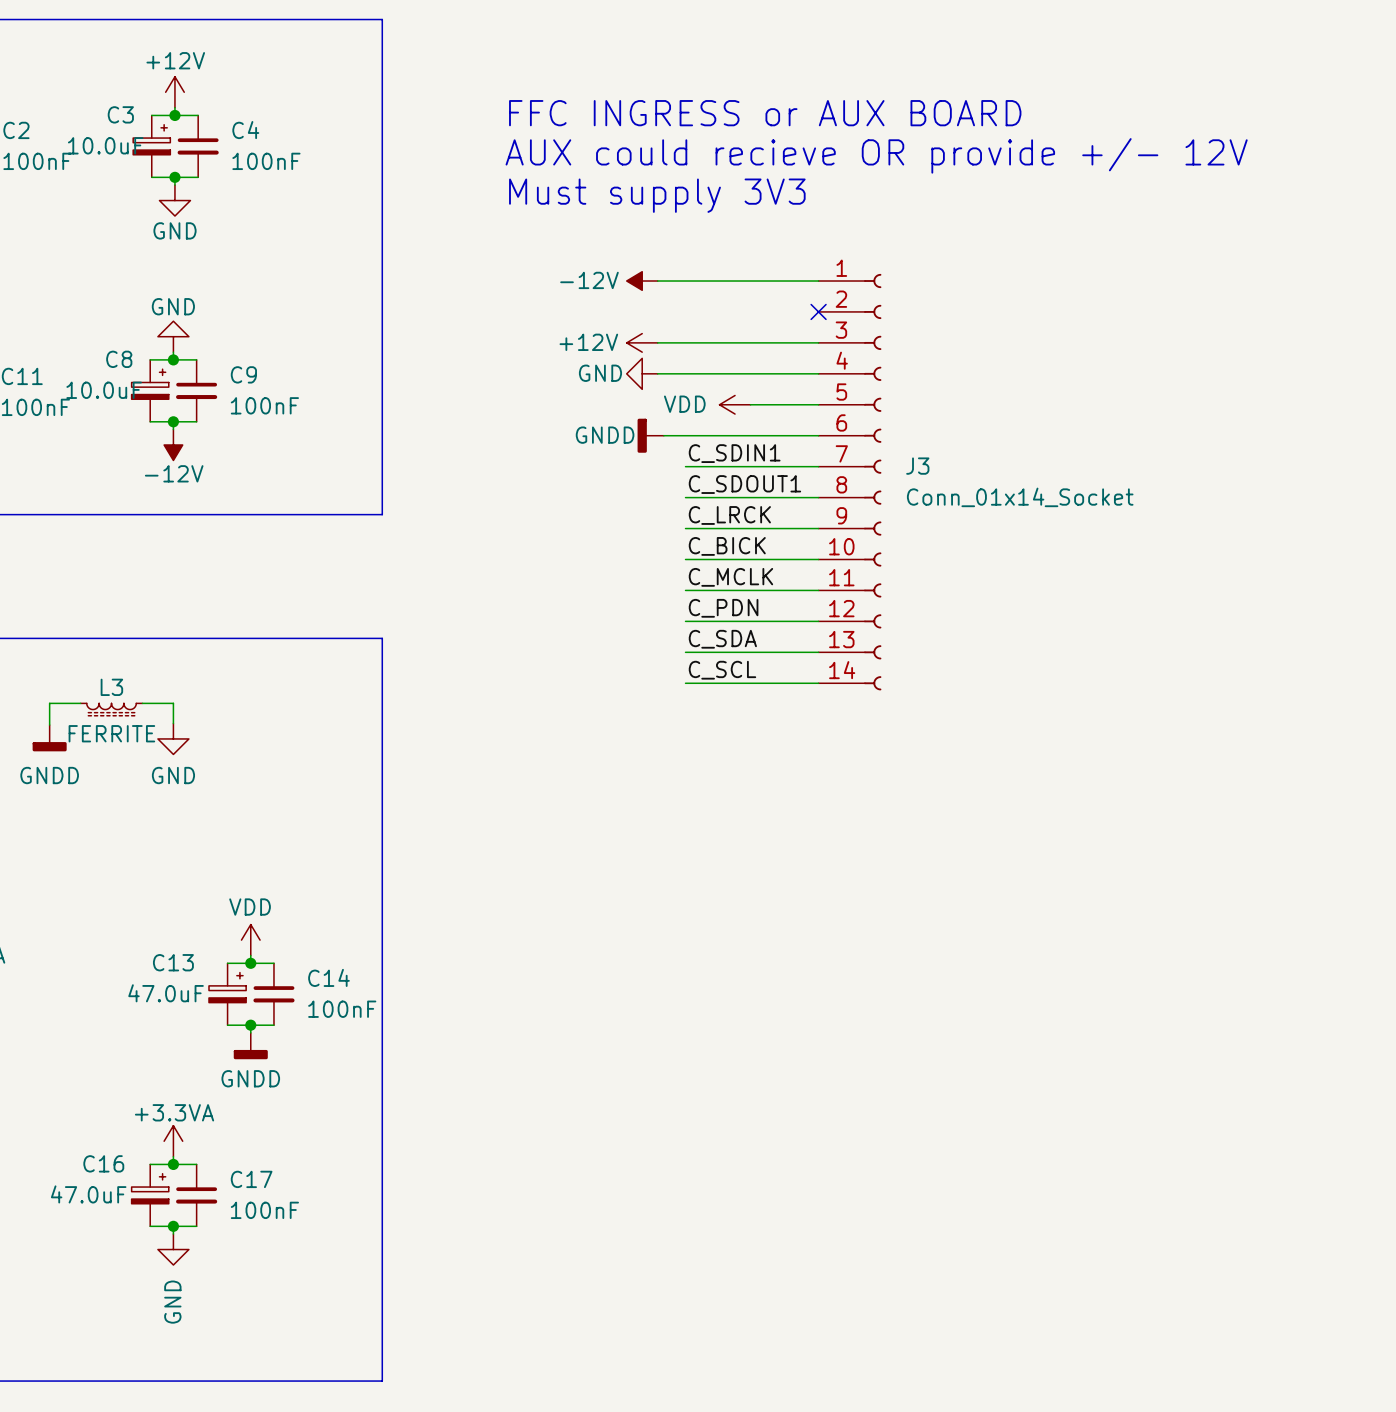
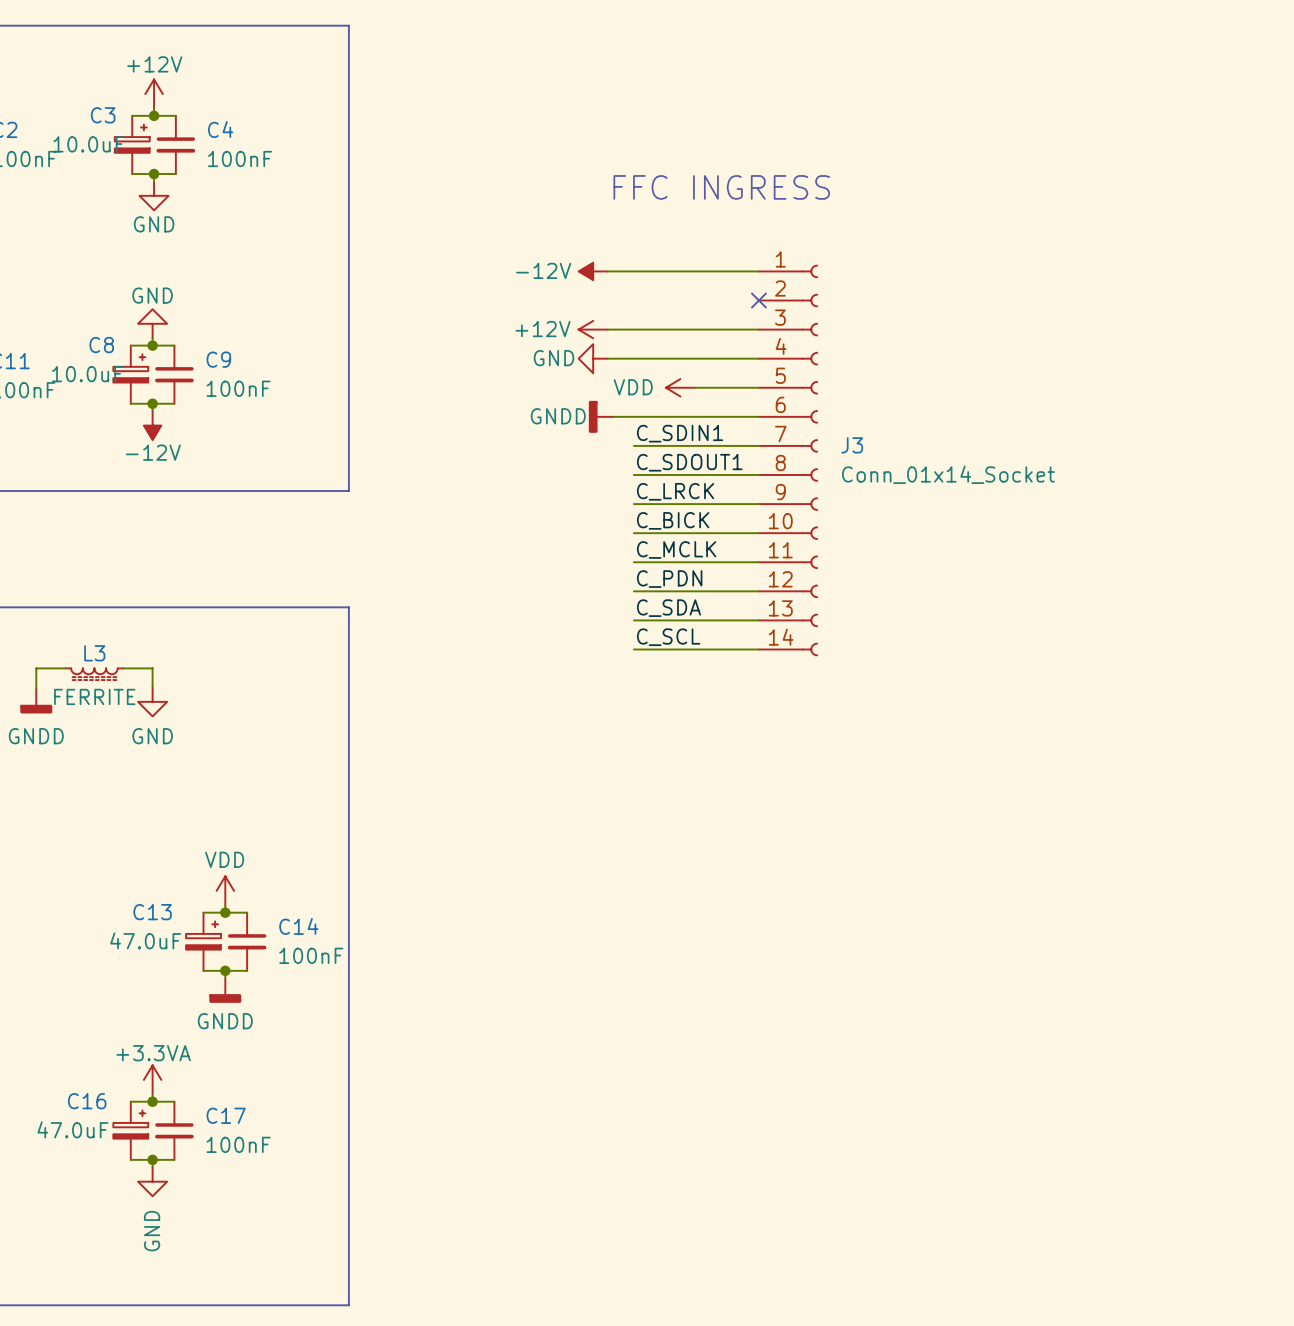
text: FFC INGRESS or AUX BOARD (765, 113) -> none
text: AUX could recieve OR provide +/- 12V (876, 155) -> none
text: none -> FFC INGRESS (721, 187)
text: Must supply 3V3 (657, 195) -> none

